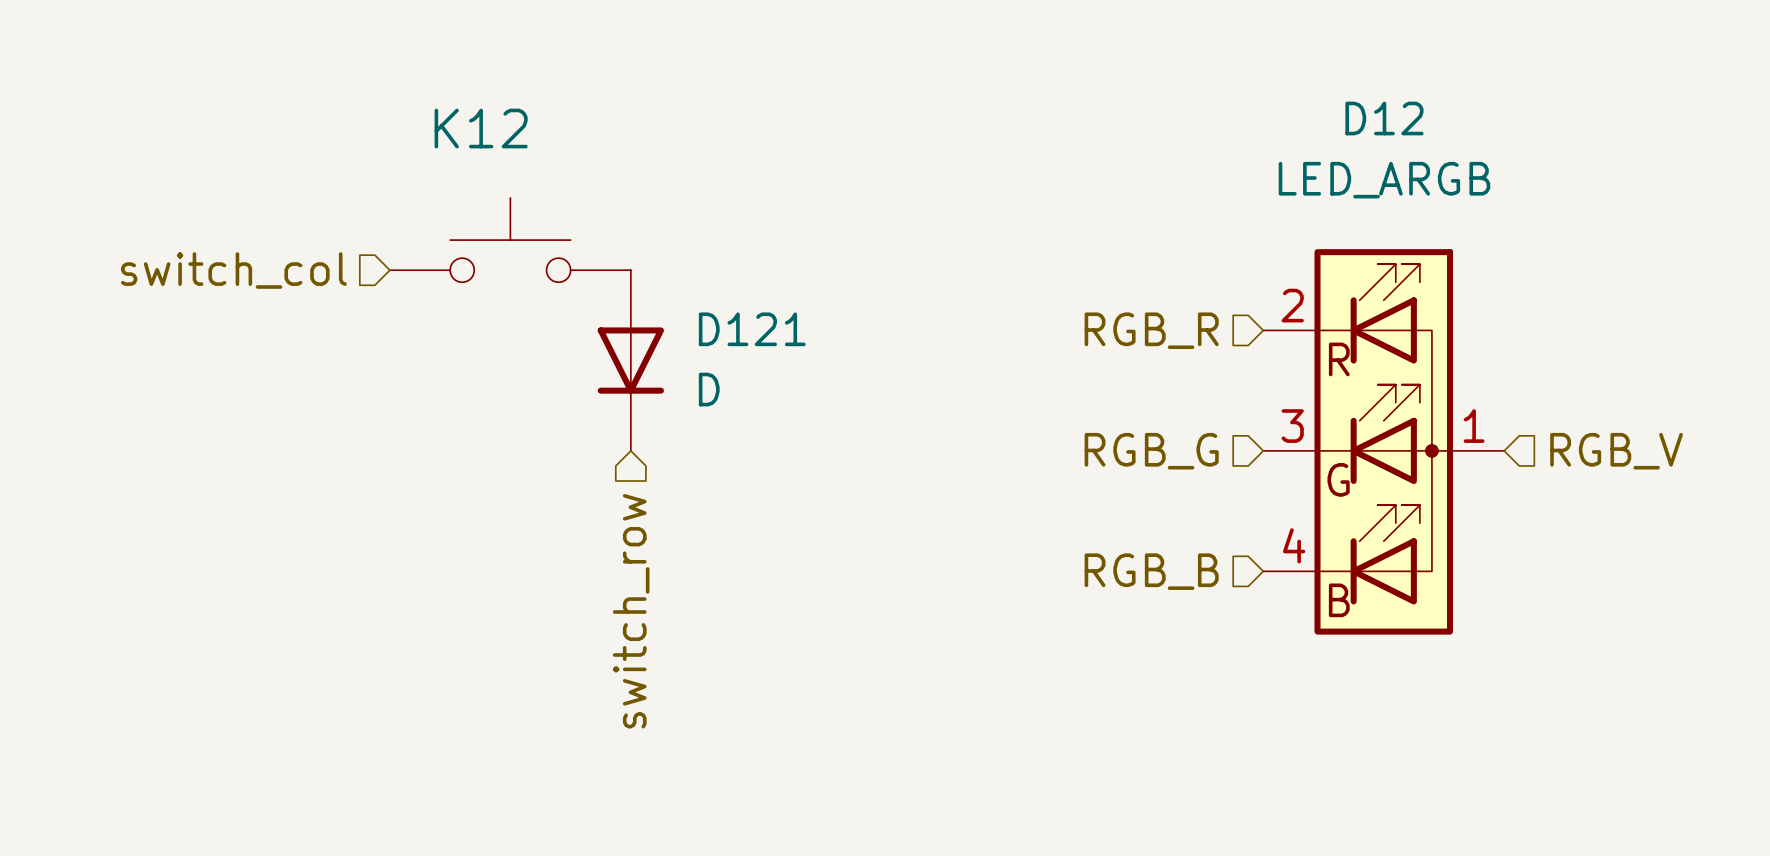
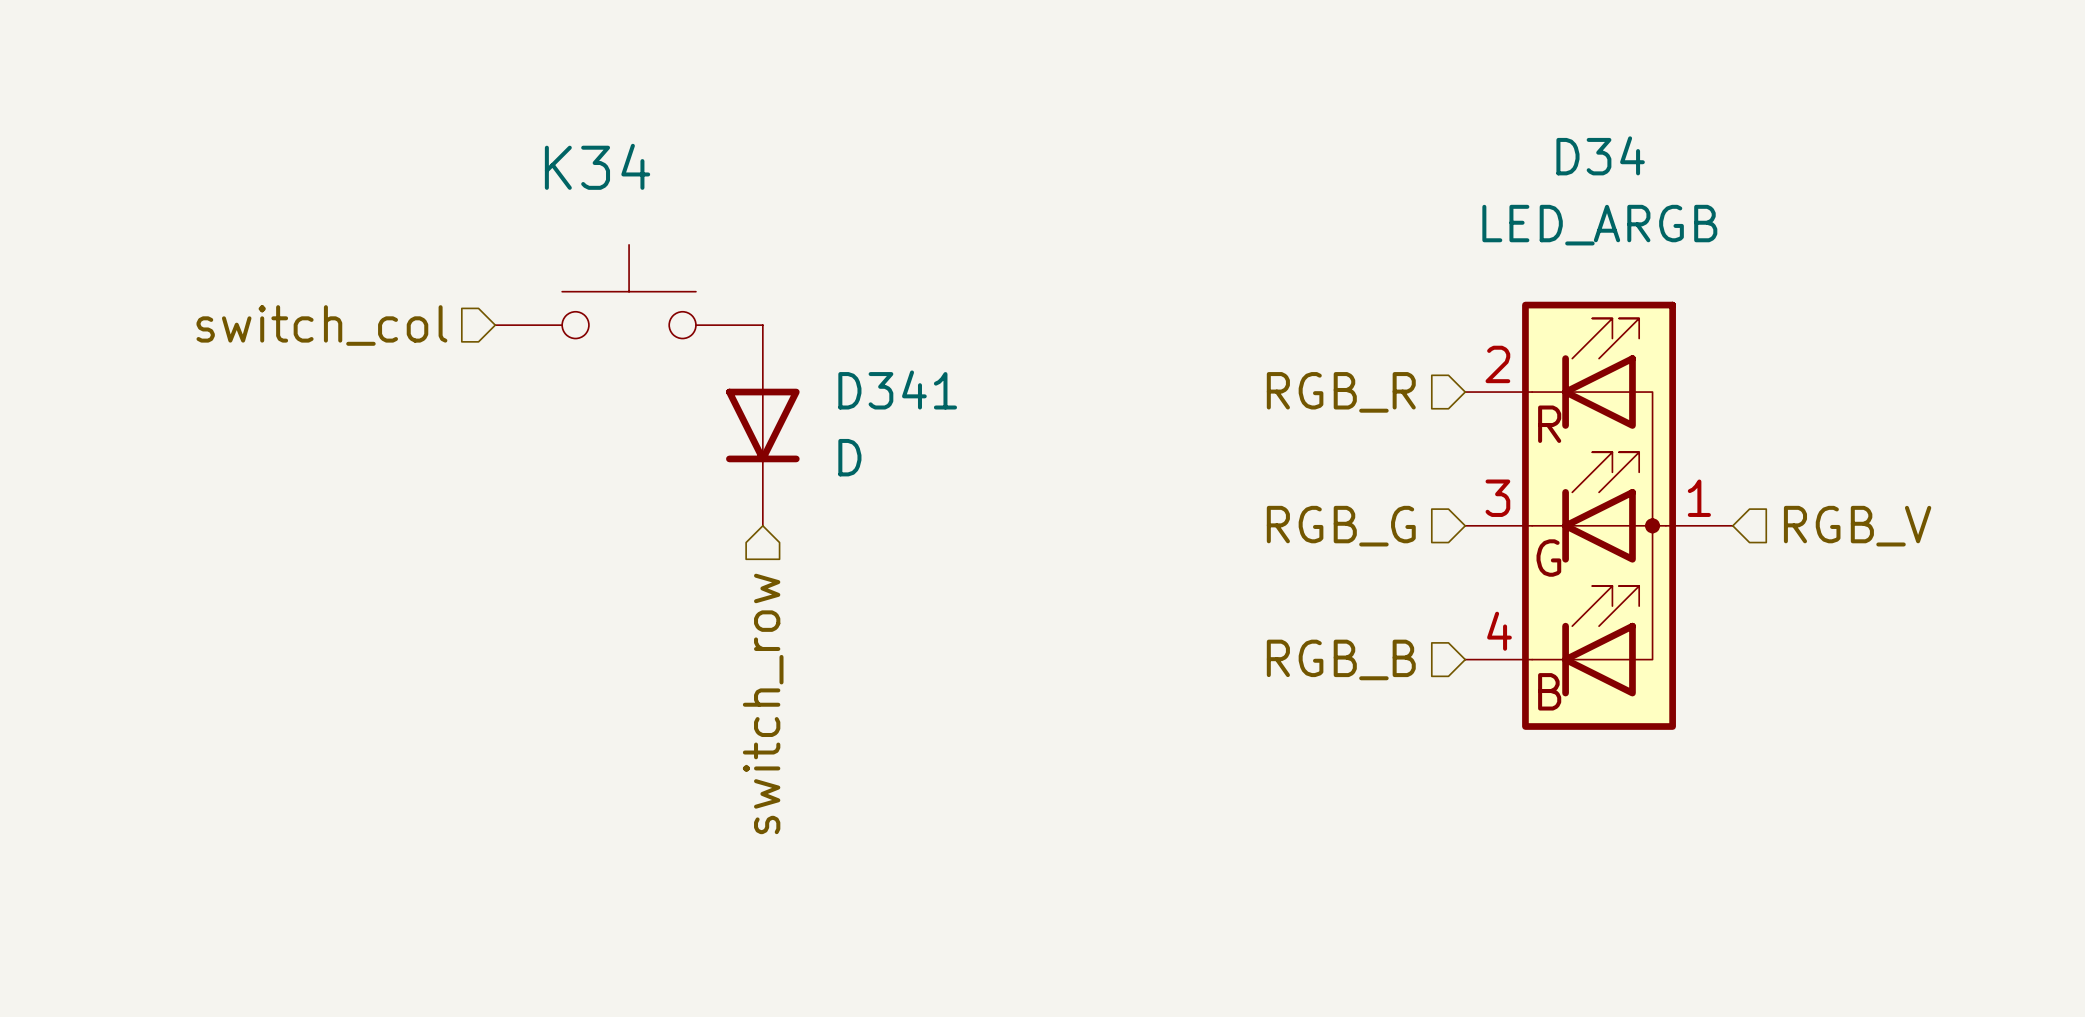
D12 name: D12 (1384, 118) -> D34 (1600, 155)
K12 name: K12 (481, 128) -> K34 (597, 166)
D121 name: D121 (752, 329) -> D341 (897, 389)

